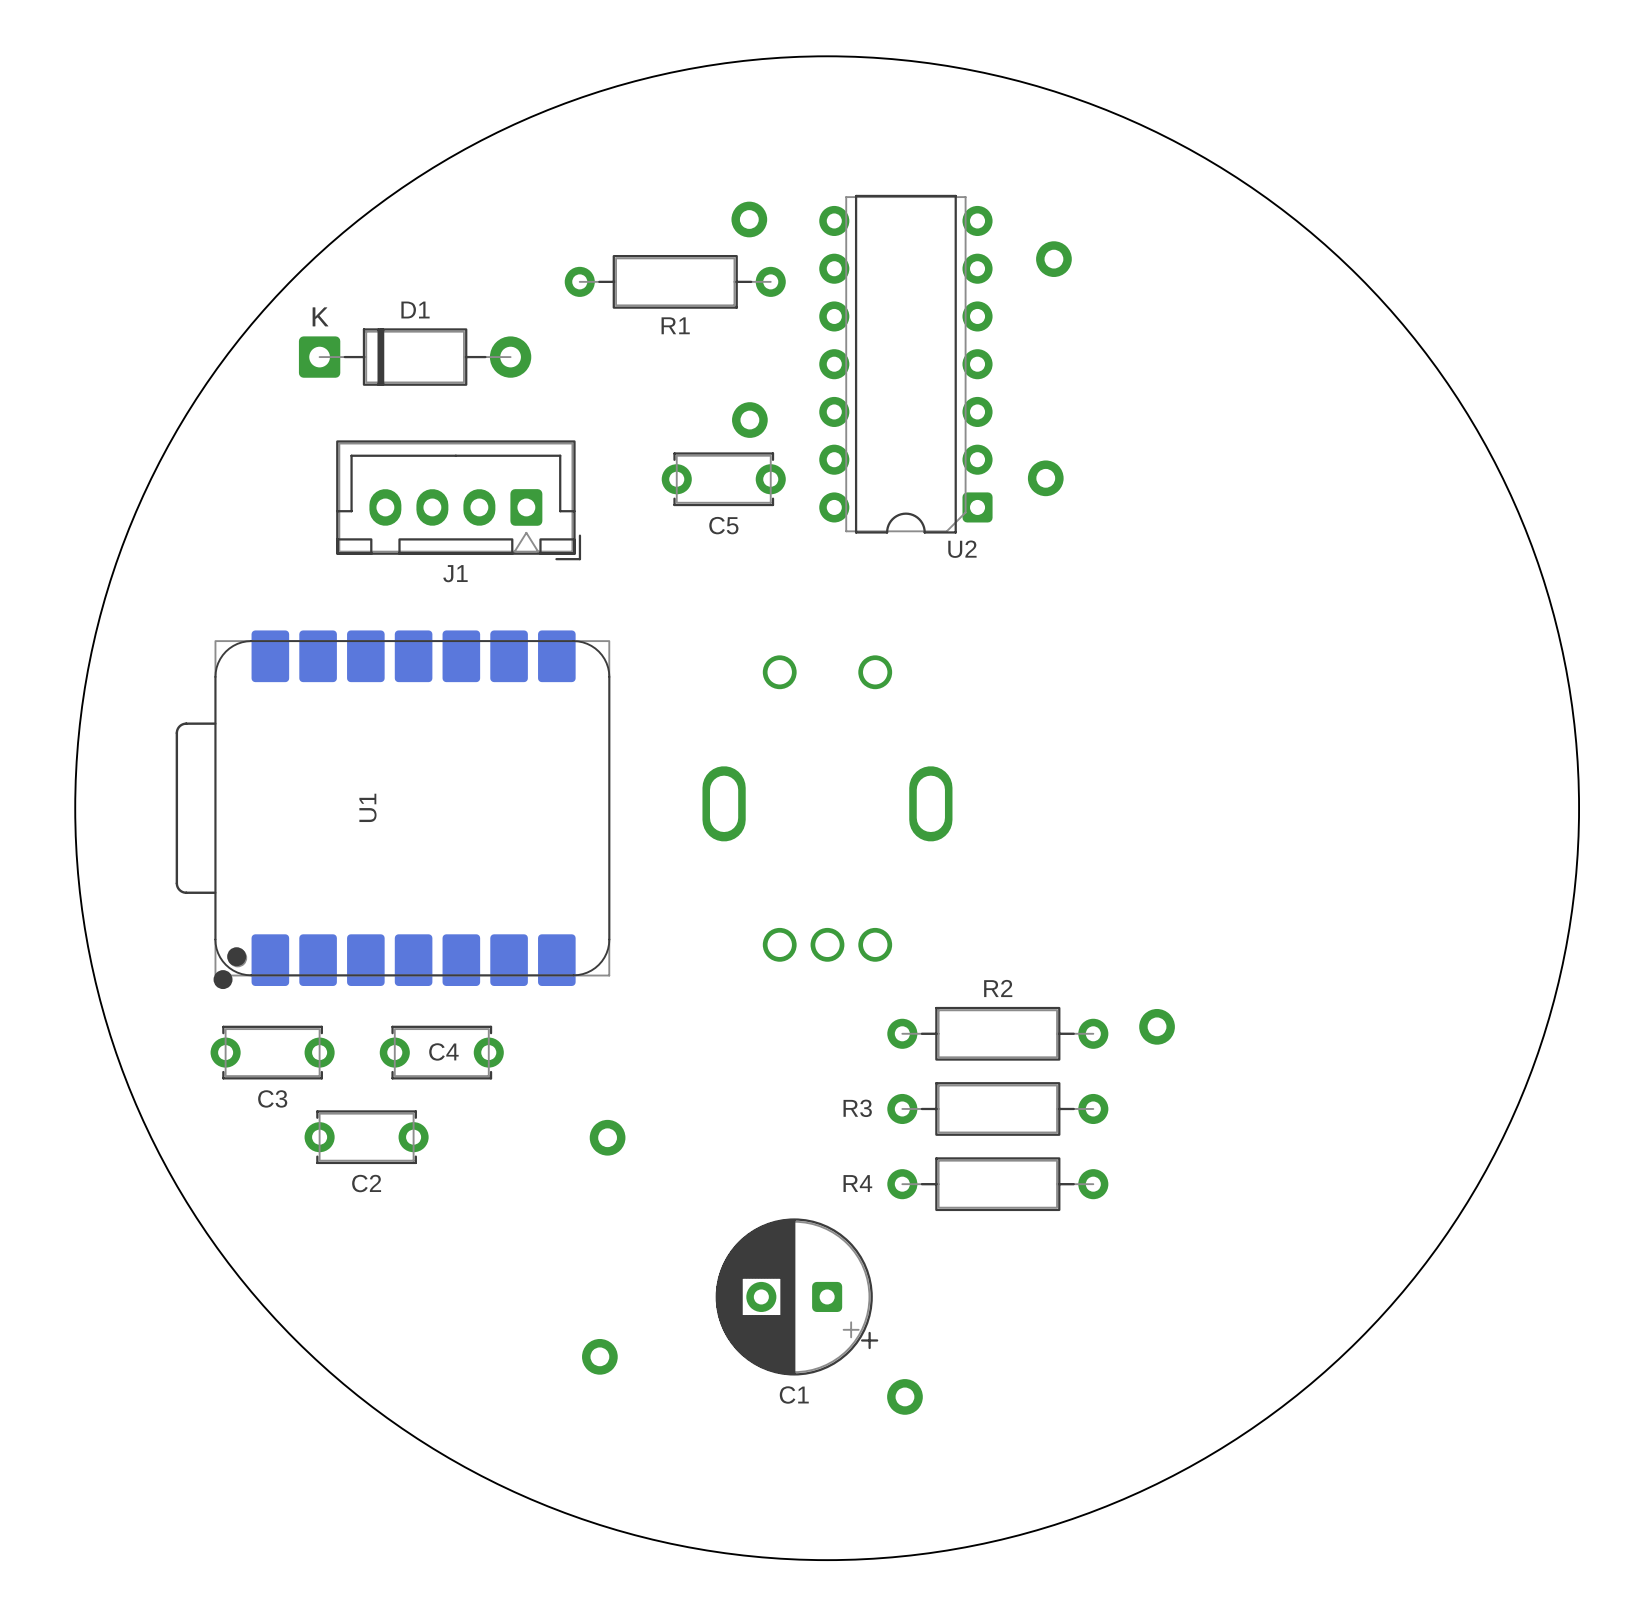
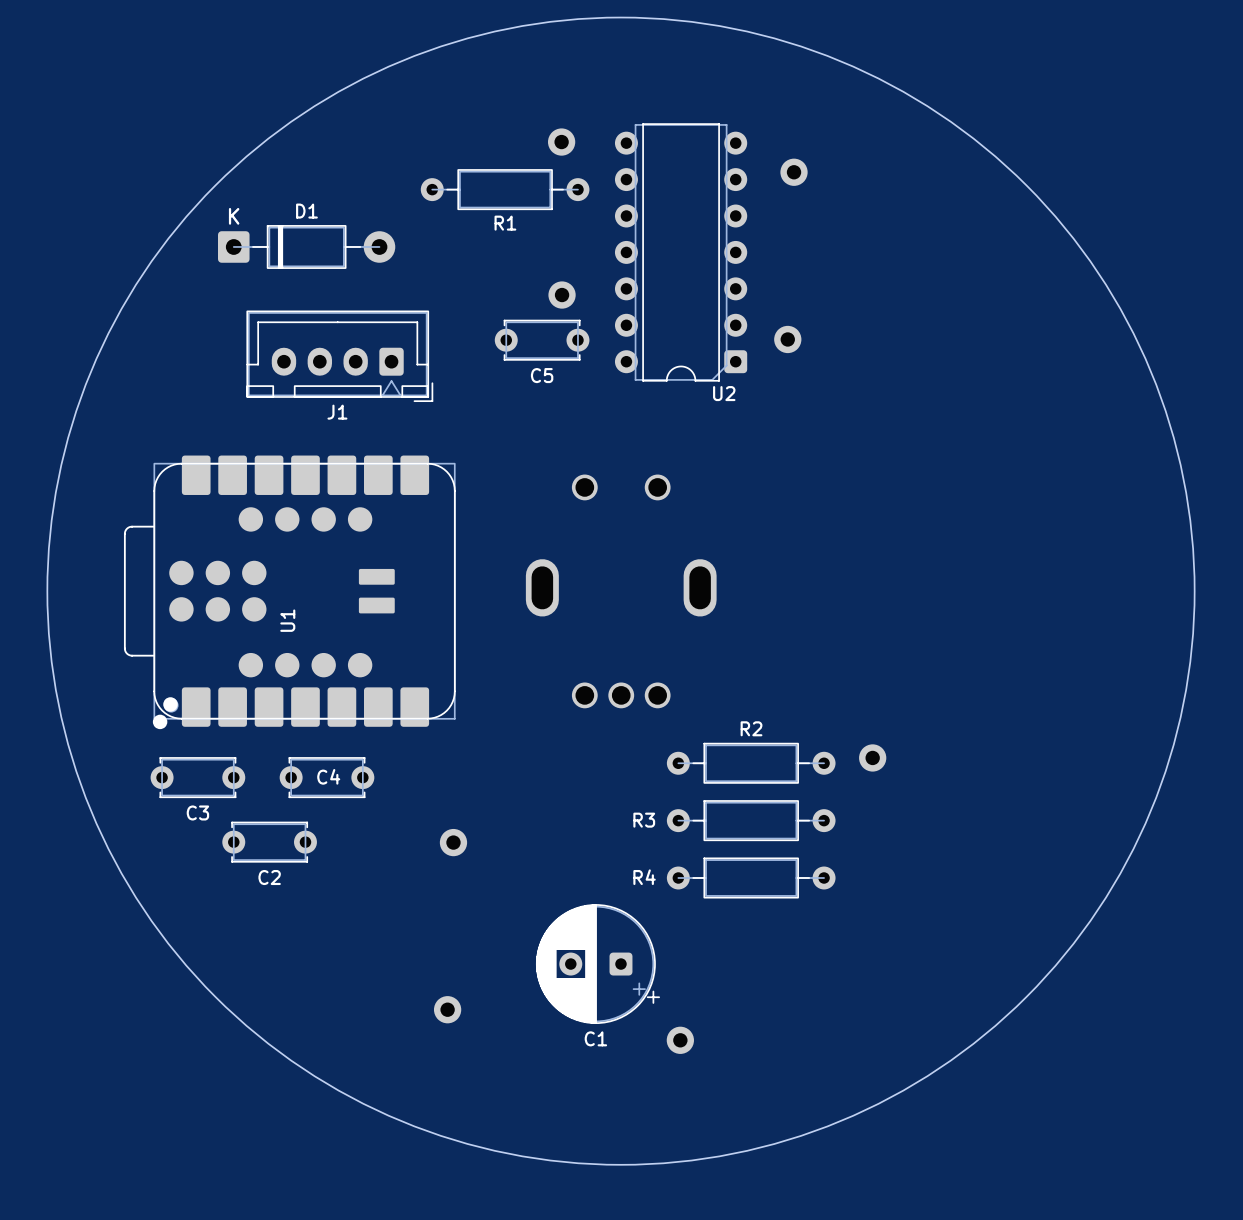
U1 footprint: [175, 630, 611, 990] -> [123, 455, 456, 730]
U1 name position: U1 (367, 807) -> U1 (287, 620)

